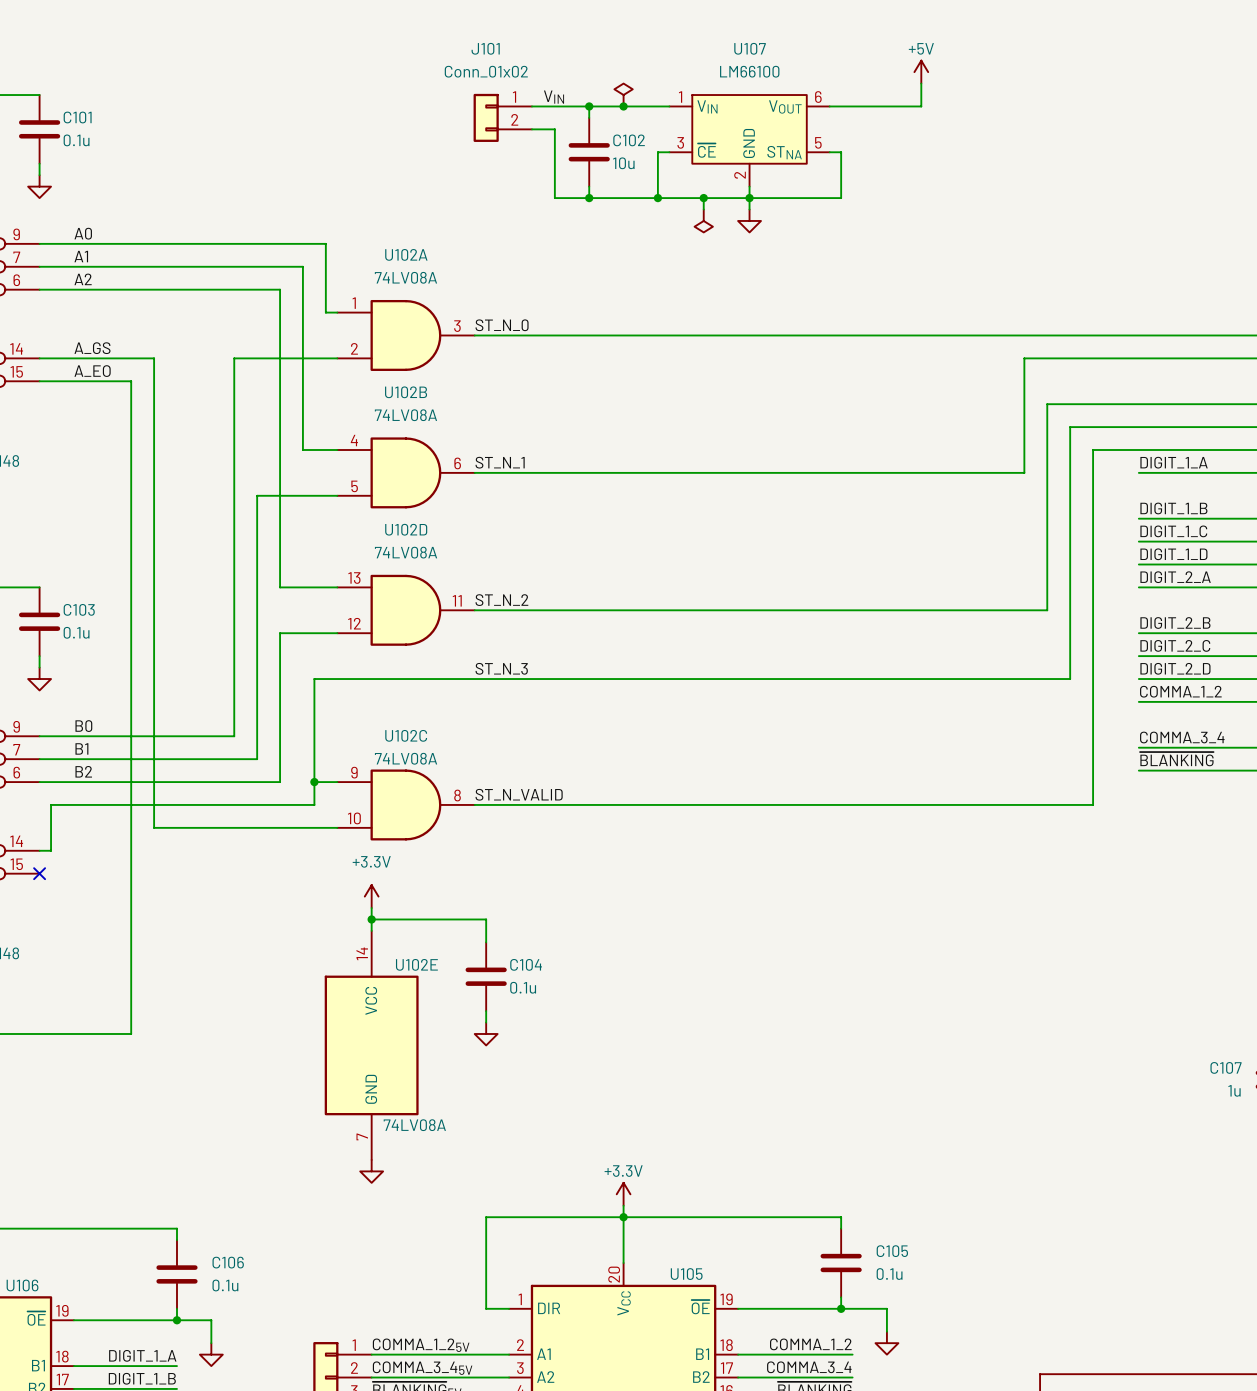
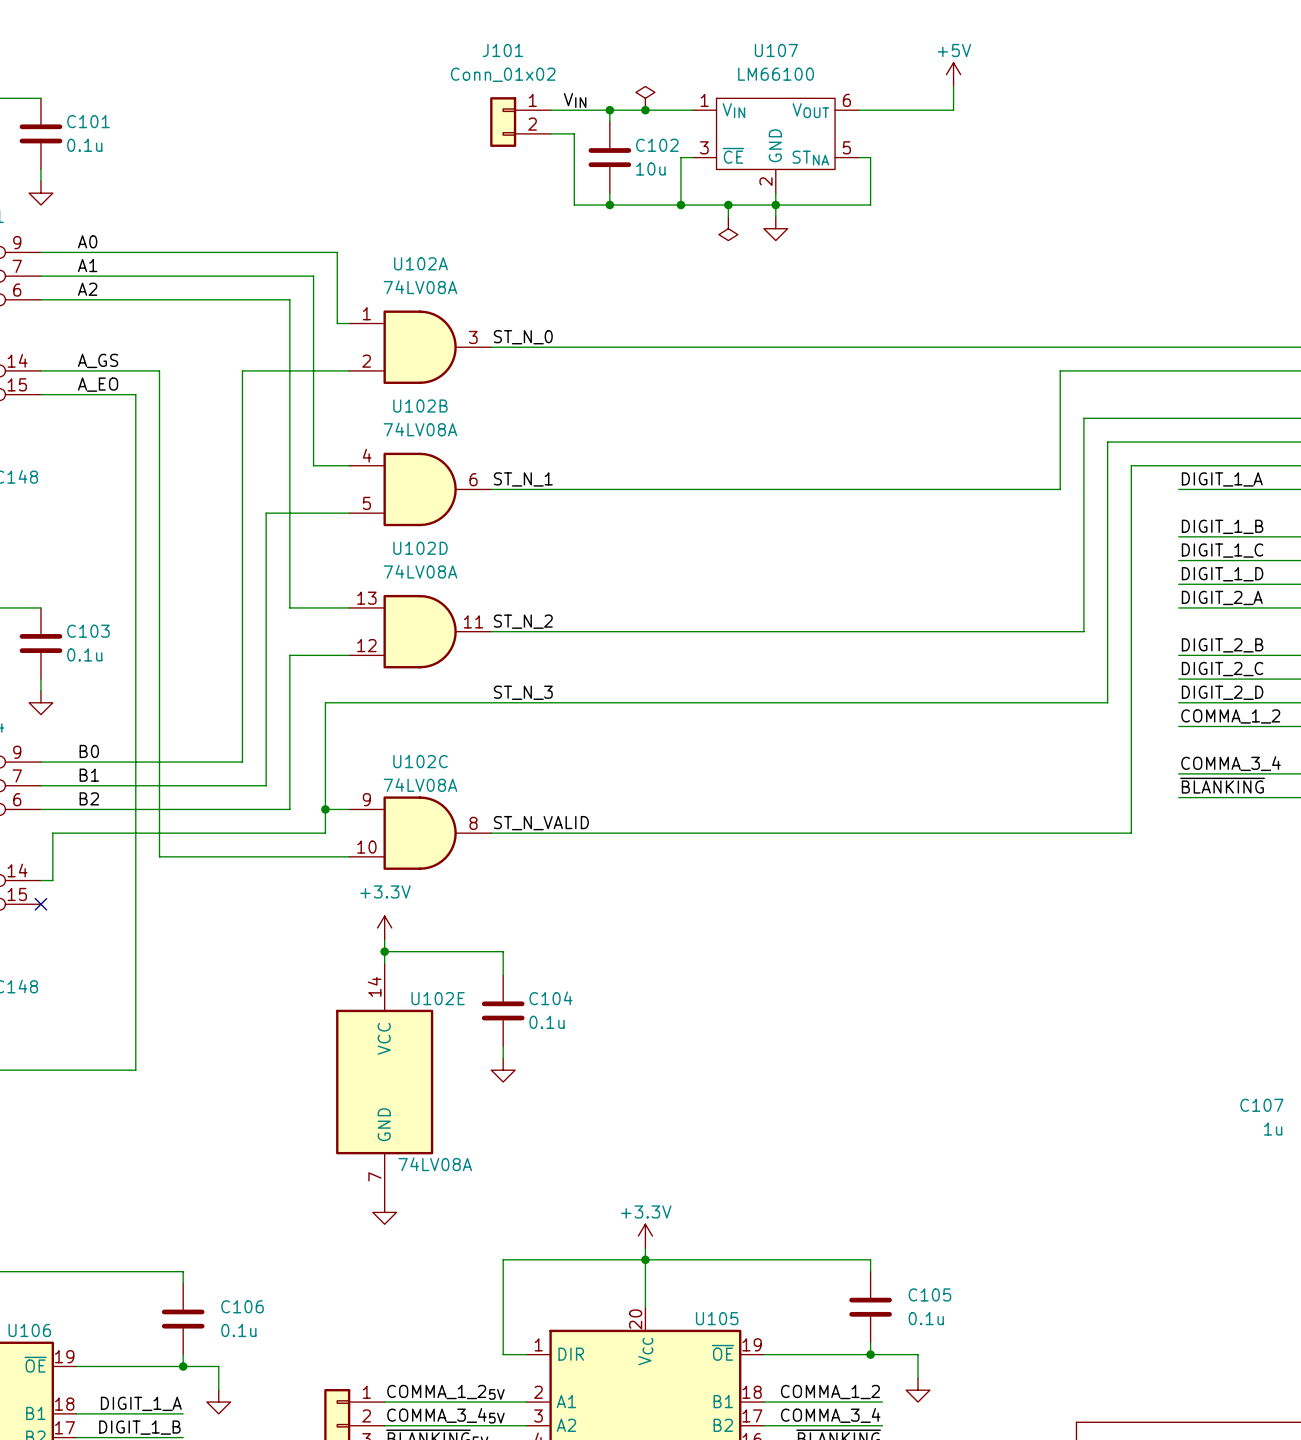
U107 symbol: [669, 95, 830, 187] -> [692, 98, 859, 194]

